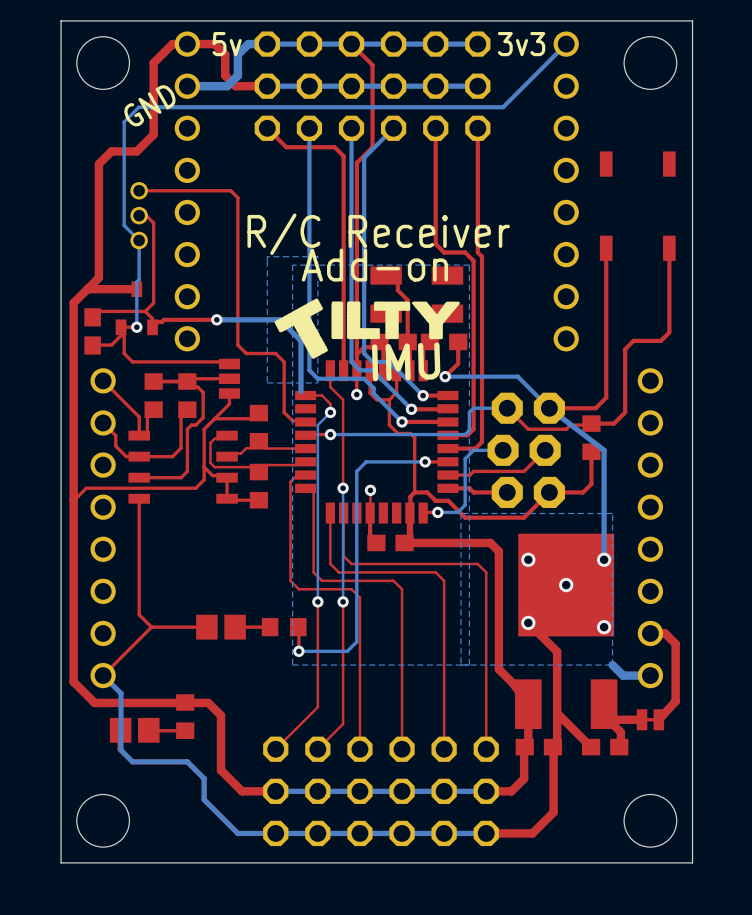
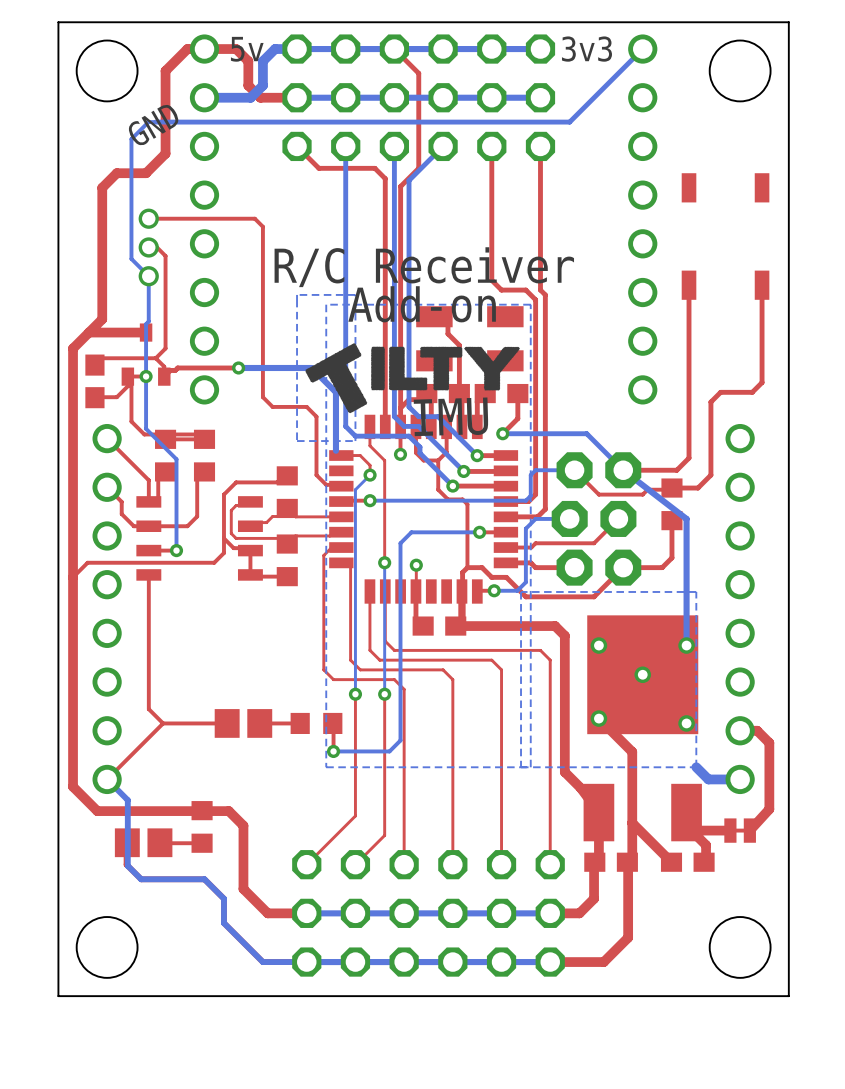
bottom track: none -> (146, 376) (146, 428) (176, 459) (176, 550)
top track: (124, 353) (132, 361) (227, 361) (229, 364) -> (131, 406) (131, 421) (144, 434) (204, 434)
top track: (229, 378) (181, 378) (178, 381) -> none
part: (229, 378) -> none
top track: (185, 381) (191, 382) (203, 392) (203, 417) (195, 425) (191, 425) (187, 429) (187, 471) (181, 477) (163, 477) -> none
top track: (229, 393) (229, 404) (214, 418) -> none
via: none -> (176, 550)

